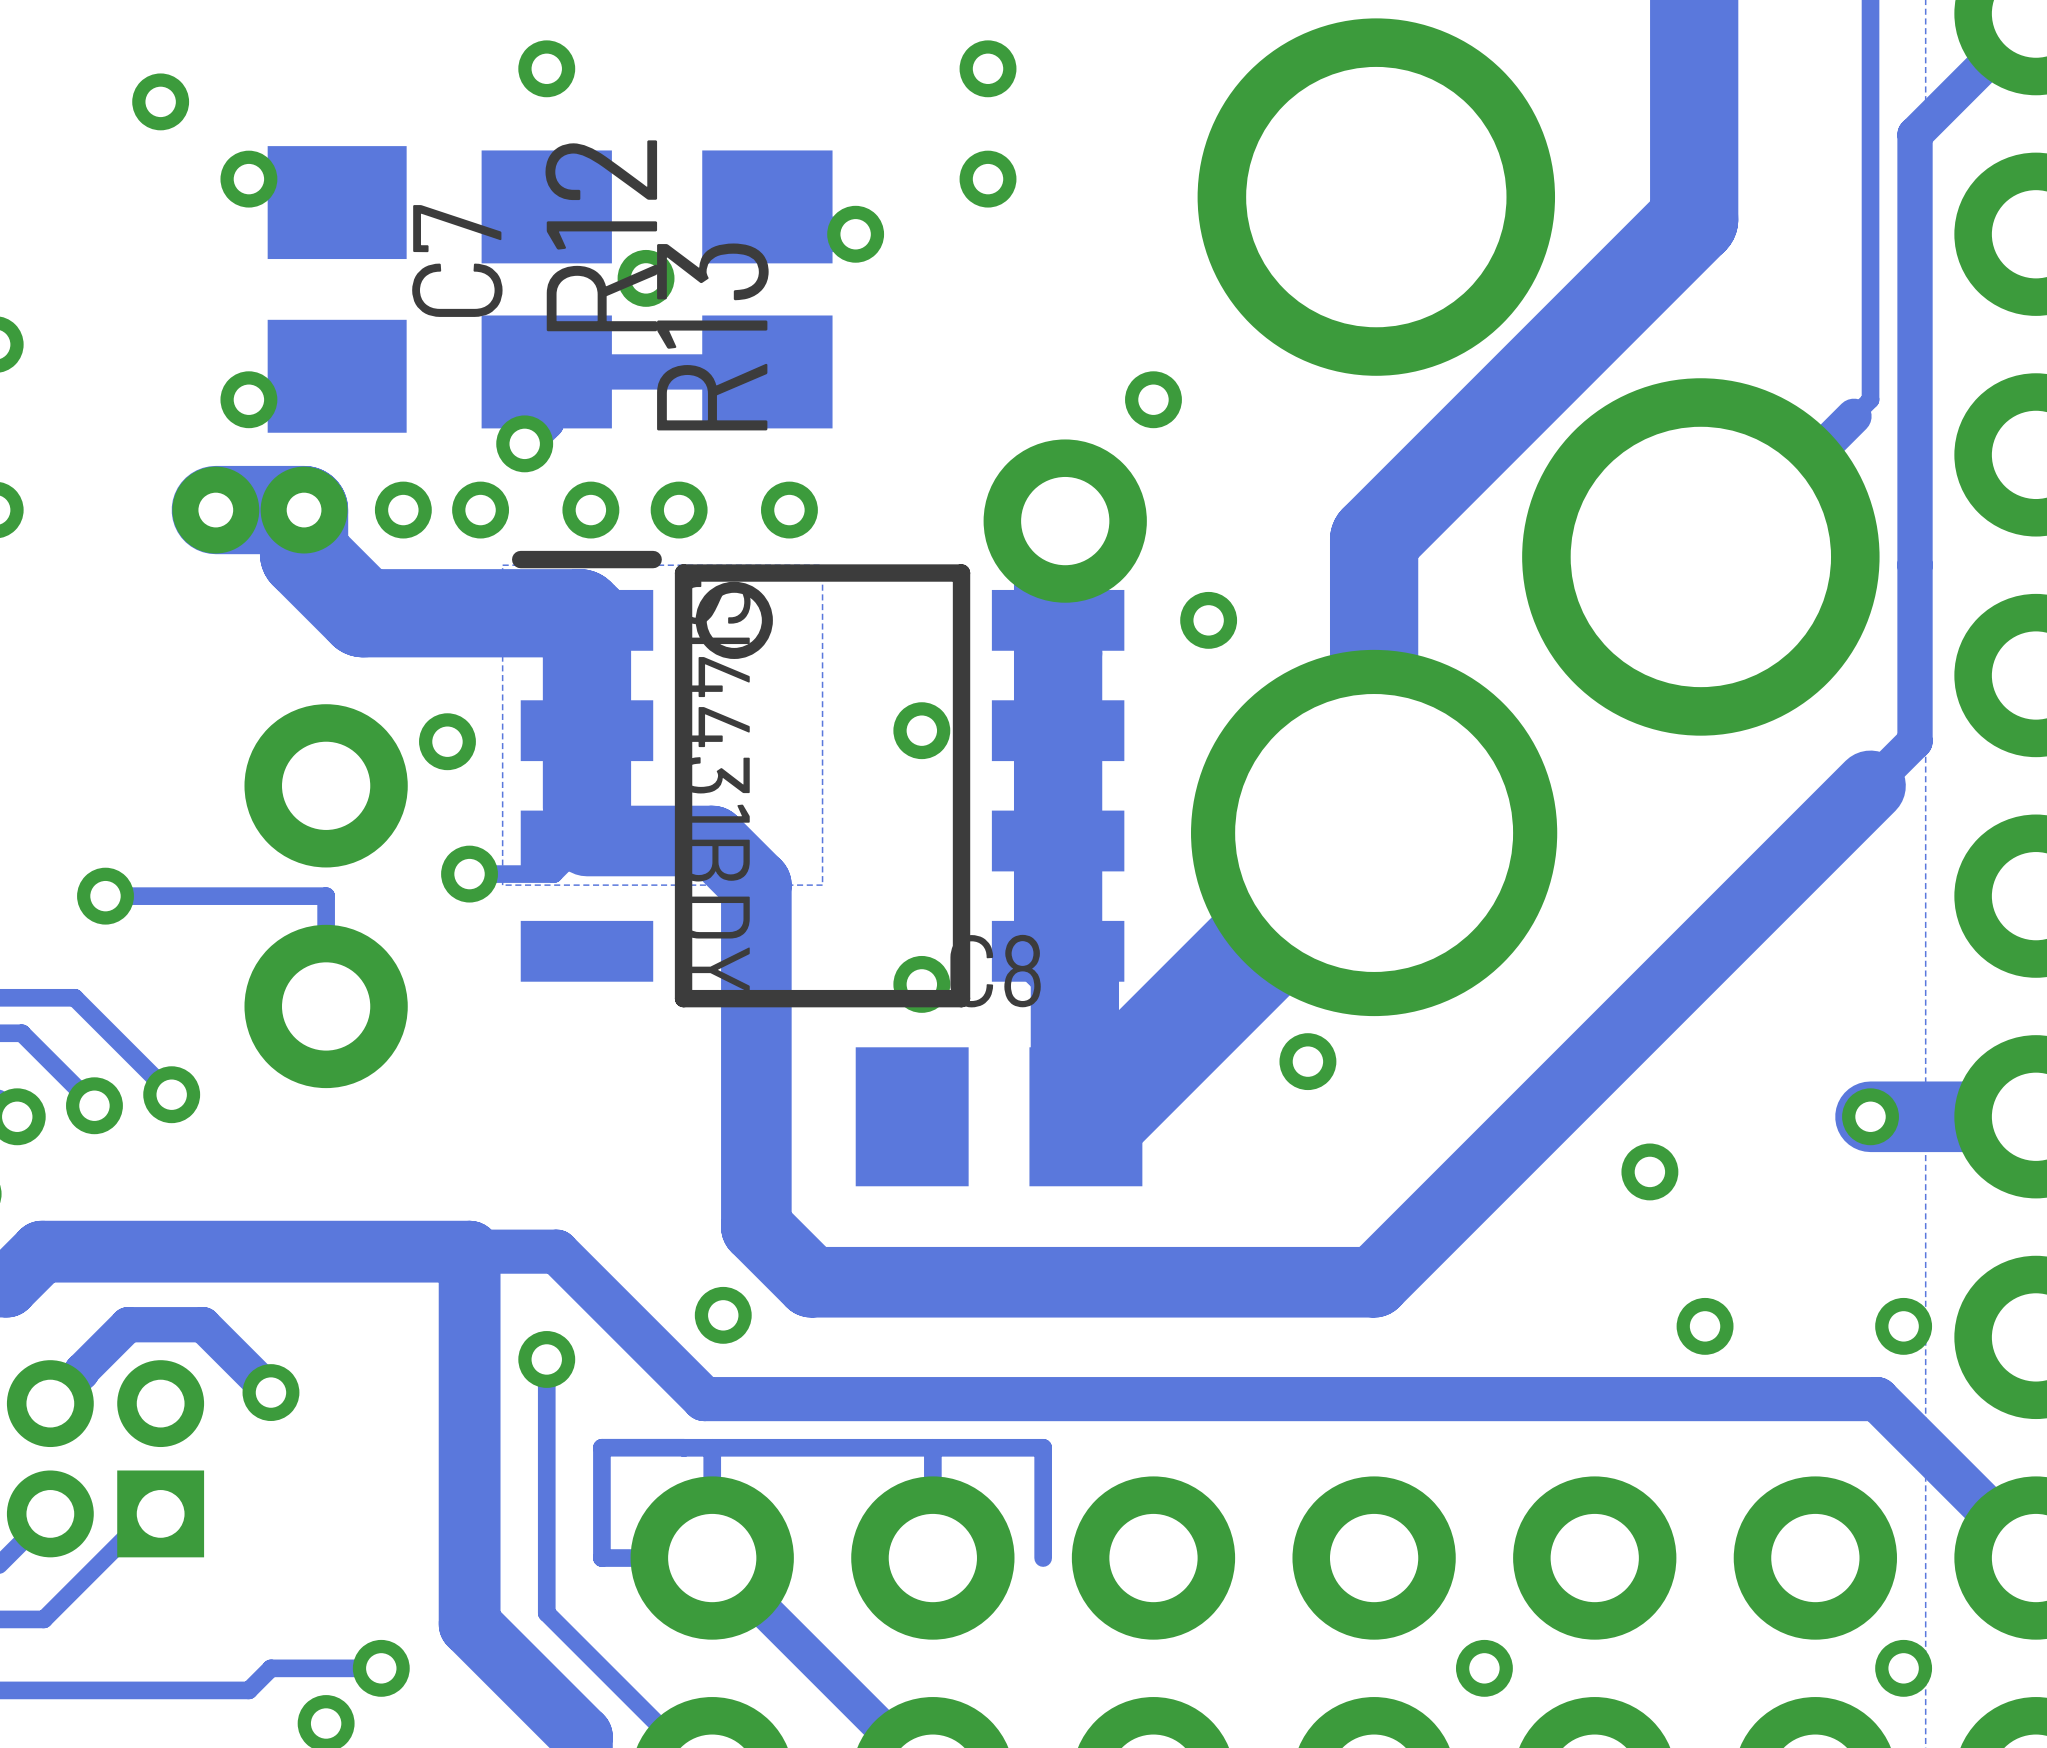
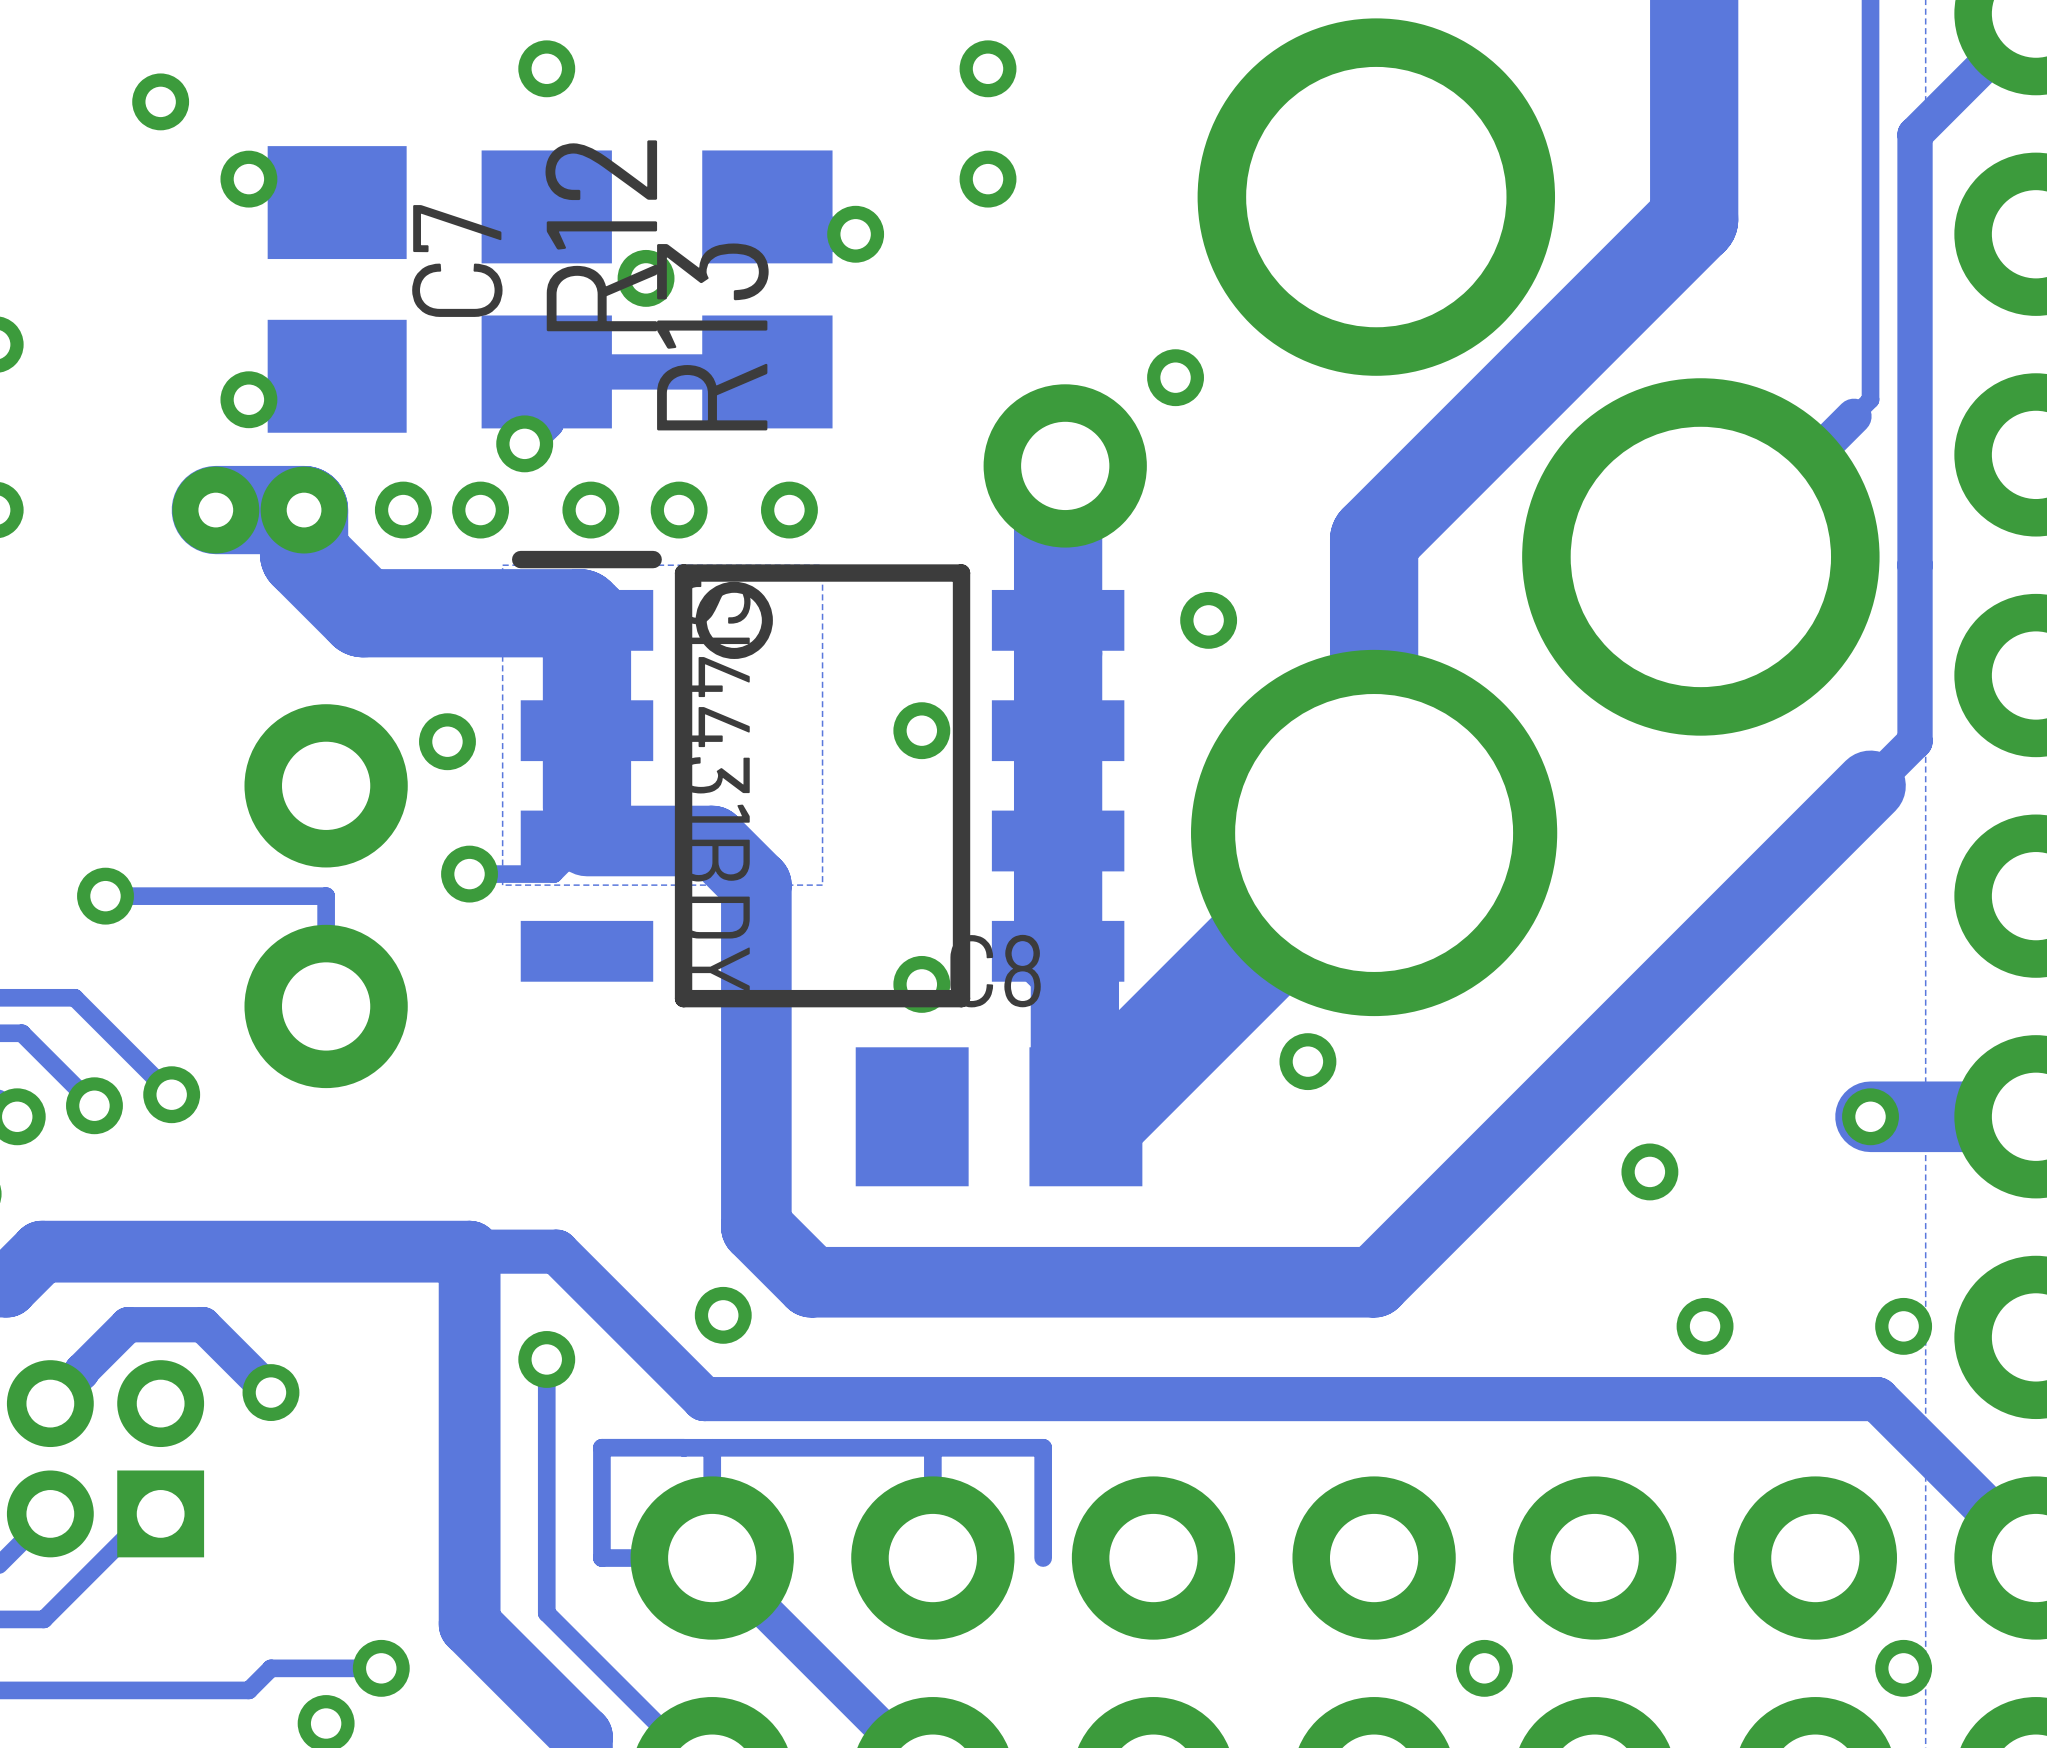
via position: (1153, 399) -> (1175, 377)
part position: (1065, 521) -> (1065, 465)

